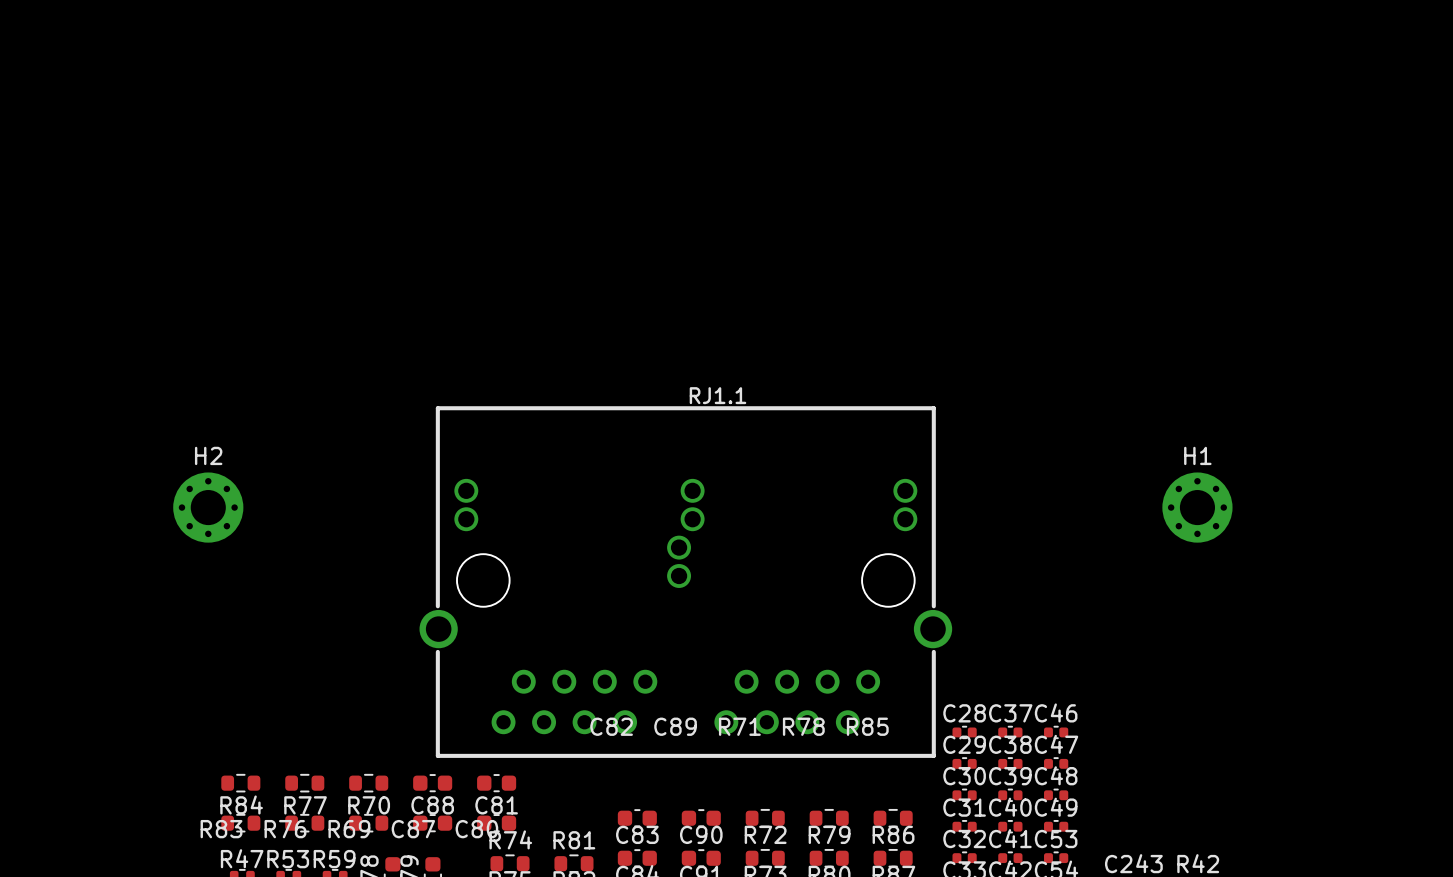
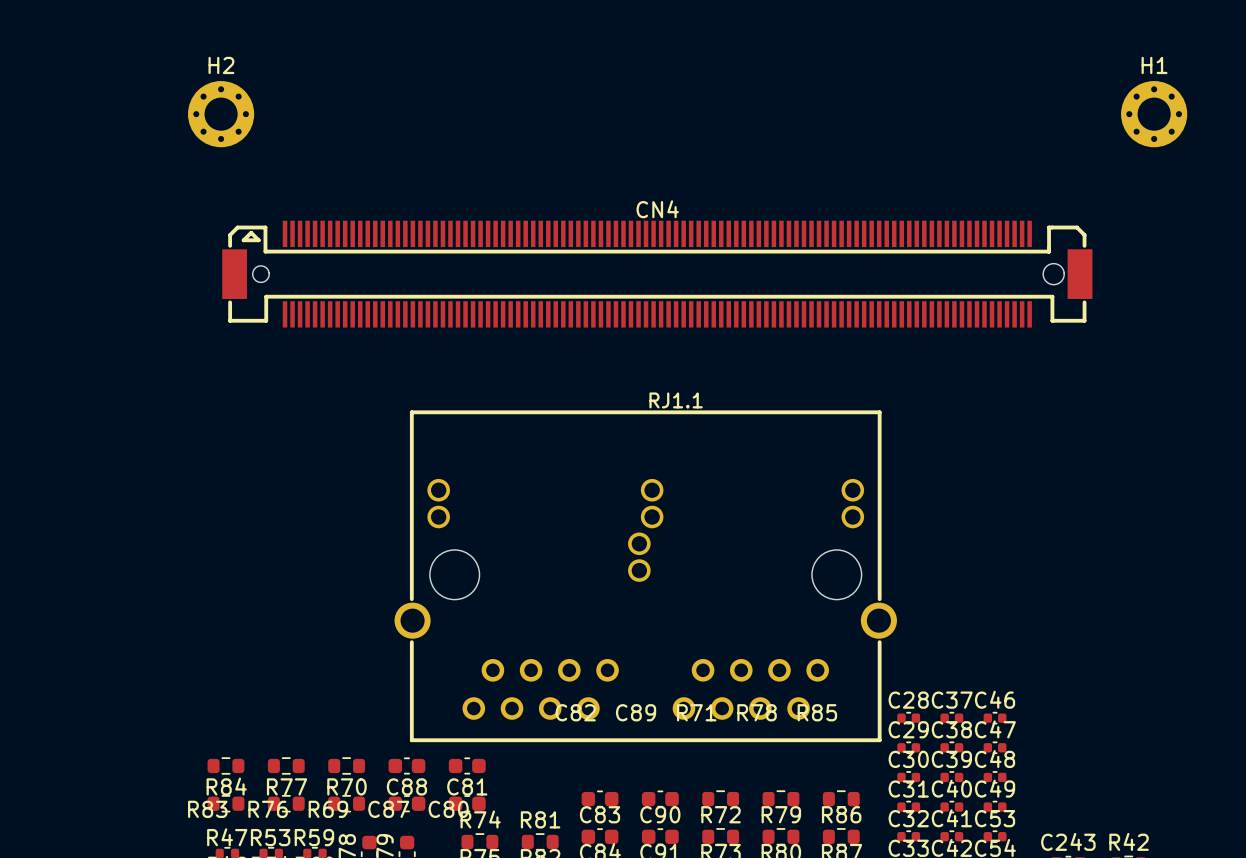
CN4: none -> (657, 274)
H2 position: (208, 507) -> (221, 114)
H1 position: (1197, 507) -> (1154, 114)

